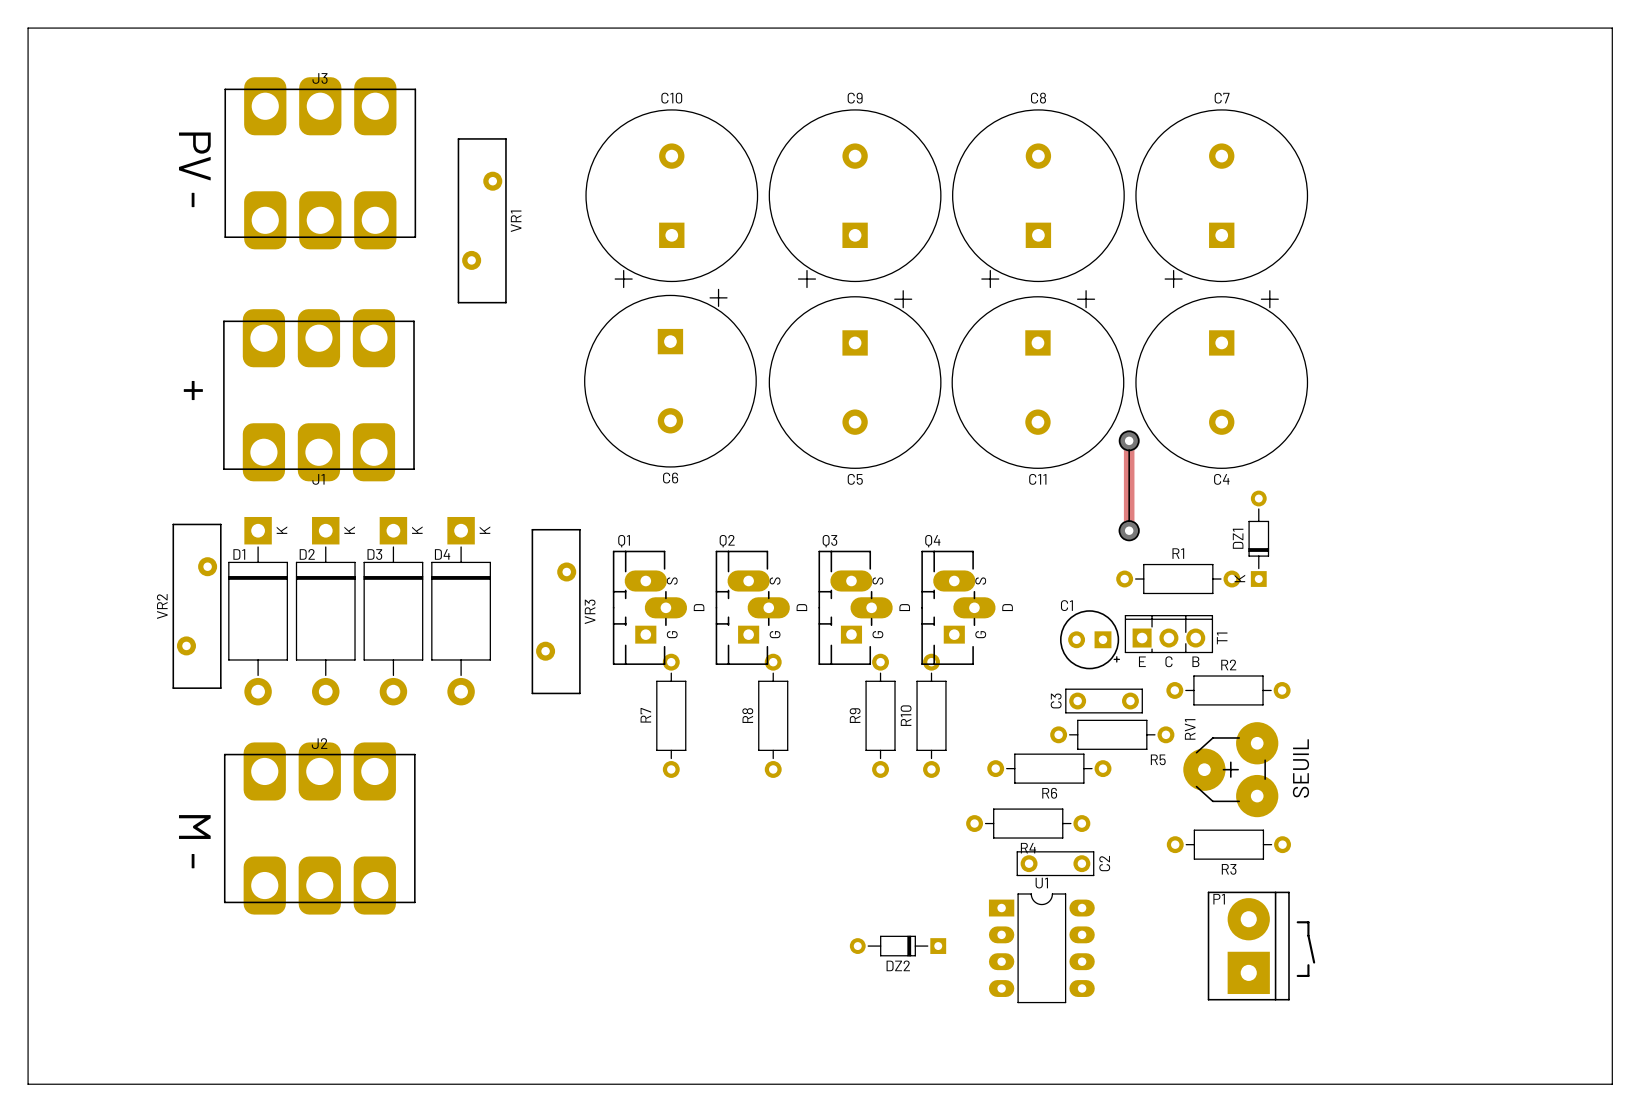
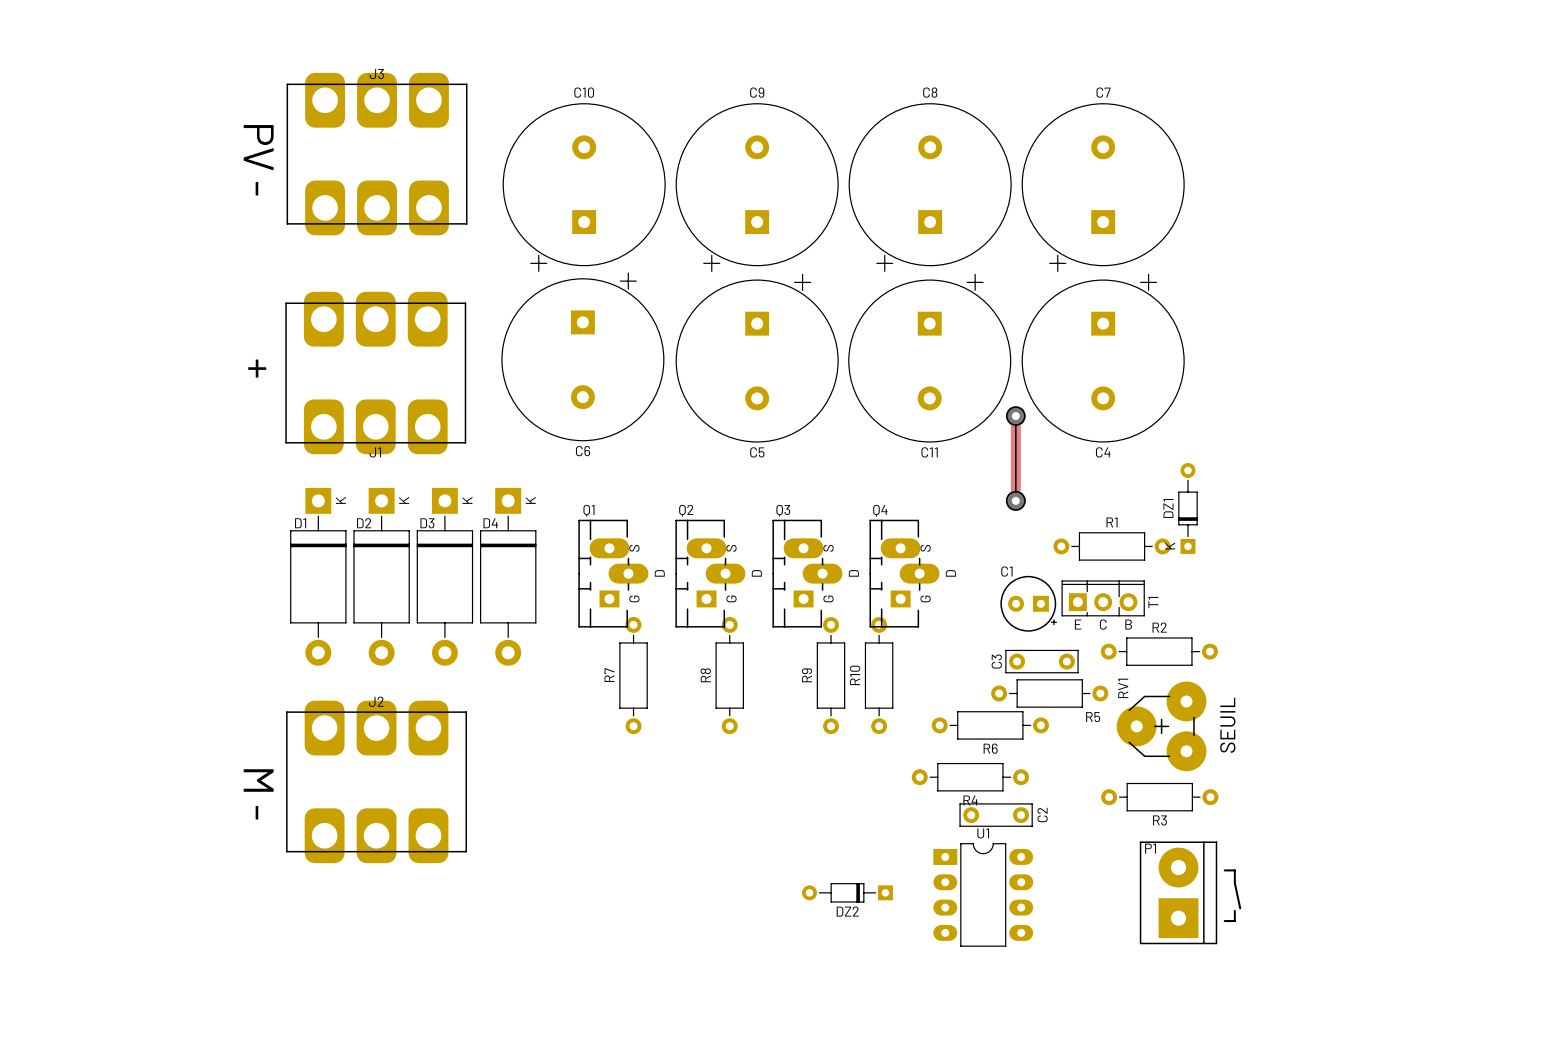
board edge: (28, 28) (28, 1084) (1612, 1084) (1612, 28) (28, 28) -> none
J3 position: (320, 163) -> (377, 154)
text position: PV - (194, 169) -> PV - (258, 160)
C10 position: (671, 198) -> (584, 187)
C9 position: (855, 198) -> (757, 187)
C8 position: (1038, 198) -> (930, 187)
C7 position: (1221, 198) -> (1103, 187)
VR1: (482, 220) -> none
C6 position: (670, 378) -> (582, 356)
C5 position: (855, 379) -> (757, 358)
C11 position: (1037, 379) -> (929, 358)
C4 position: (1221, 379) -> (1103, 358)
text position: + (193, 390) -> + (257, 368)
J1 position: (318, 395) -> (375, 373)
via: none -> (1015, 416)
track: (1129, 440) (1129, 530) -> (1015, 416) (1015, 500)
drawing position: (1129, 440) -> (1015, 416)
via: (1129, 440) -> none
line: (1129, 450) (1129, 521) -> (1015, 424) (1015, 491)
via: none -> (1015, 500)
drawing position: (1129, 530) -> (1015, 500)
via: (1129, 530) -> none
VR2: (197, 606) -> none
D1 position: (258, 611) -> (318, 576)
D2 position: (325, 611) -> (381, 576)
D3 position: (393, 611) -> (444, 576)
D4 position: (461, 611) -> (508, 576)
VR3: (556, 611) -> none
J2 position: (319, 828) -> (376, 781)
text position: M - (194, 841) -> M - (258, 794)

